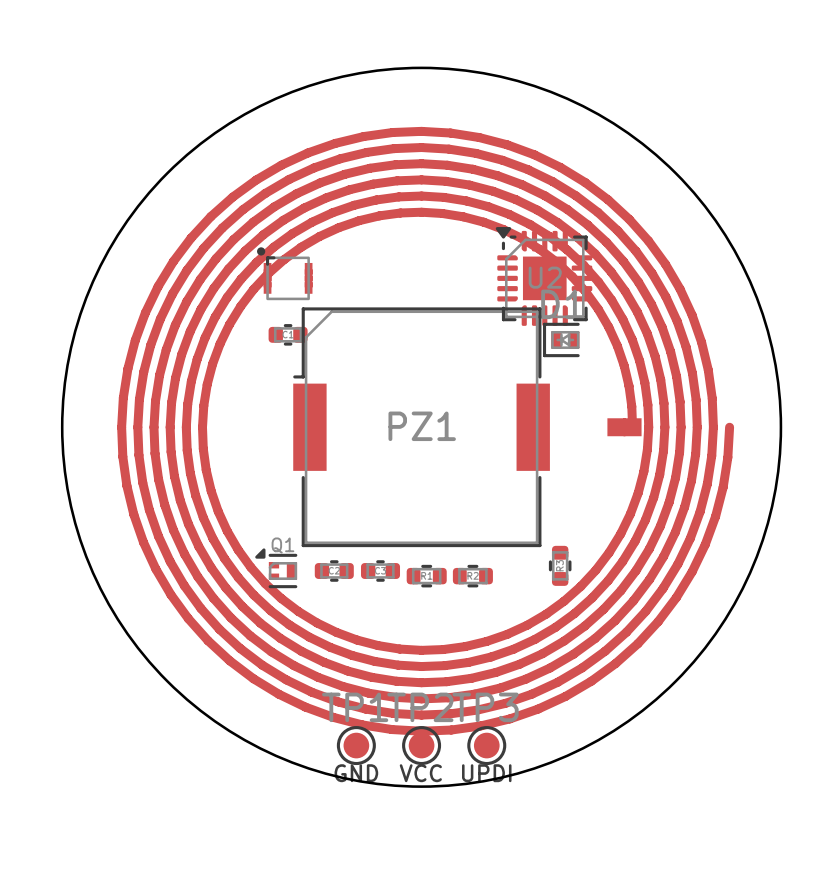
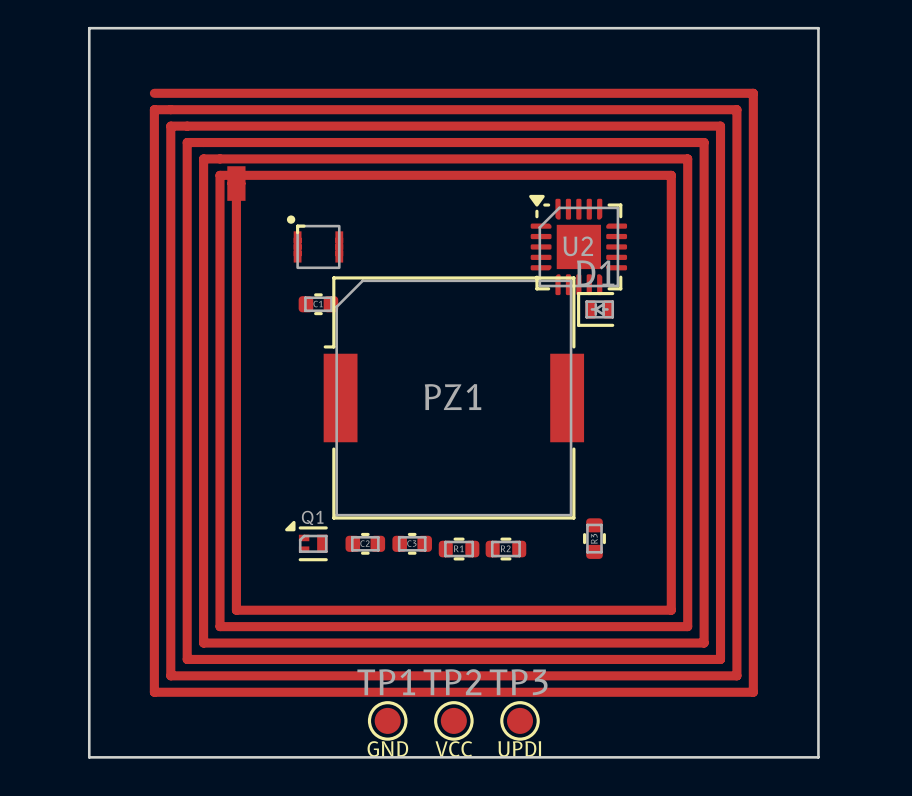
board edge: none -> (89, 28) (89, 757) (818, 757) (818, 28) (89, 28)
round board edge: [60, 66, 783, 788] -> none
part footprint: [117, 126, 735, 736] -> [149, 88, 758, 697]

